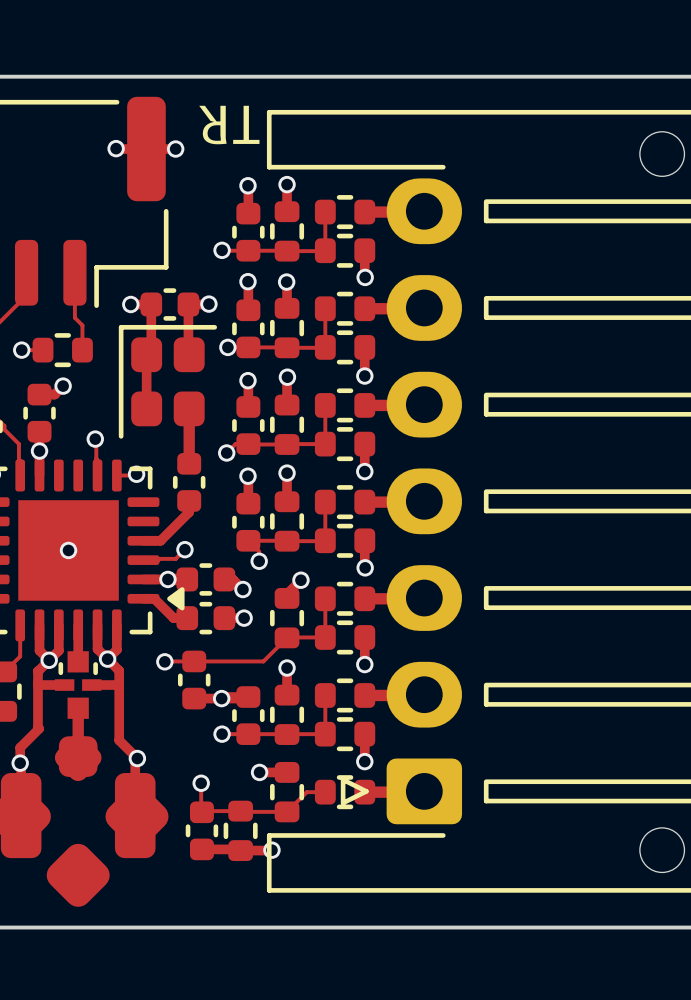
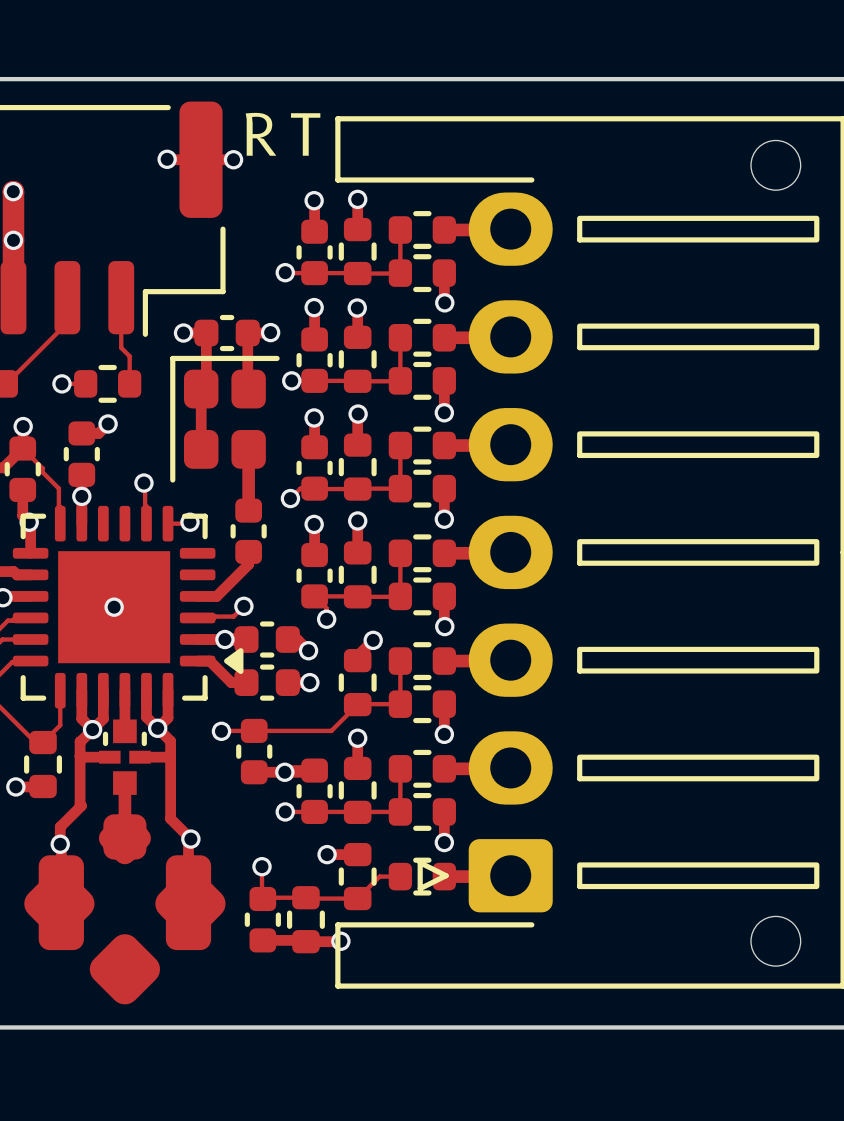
text rotation: 0° (246, 124) -> 180° (305, 134)
text rotation: 0° (212, 125) -> 180° (260, 134)

